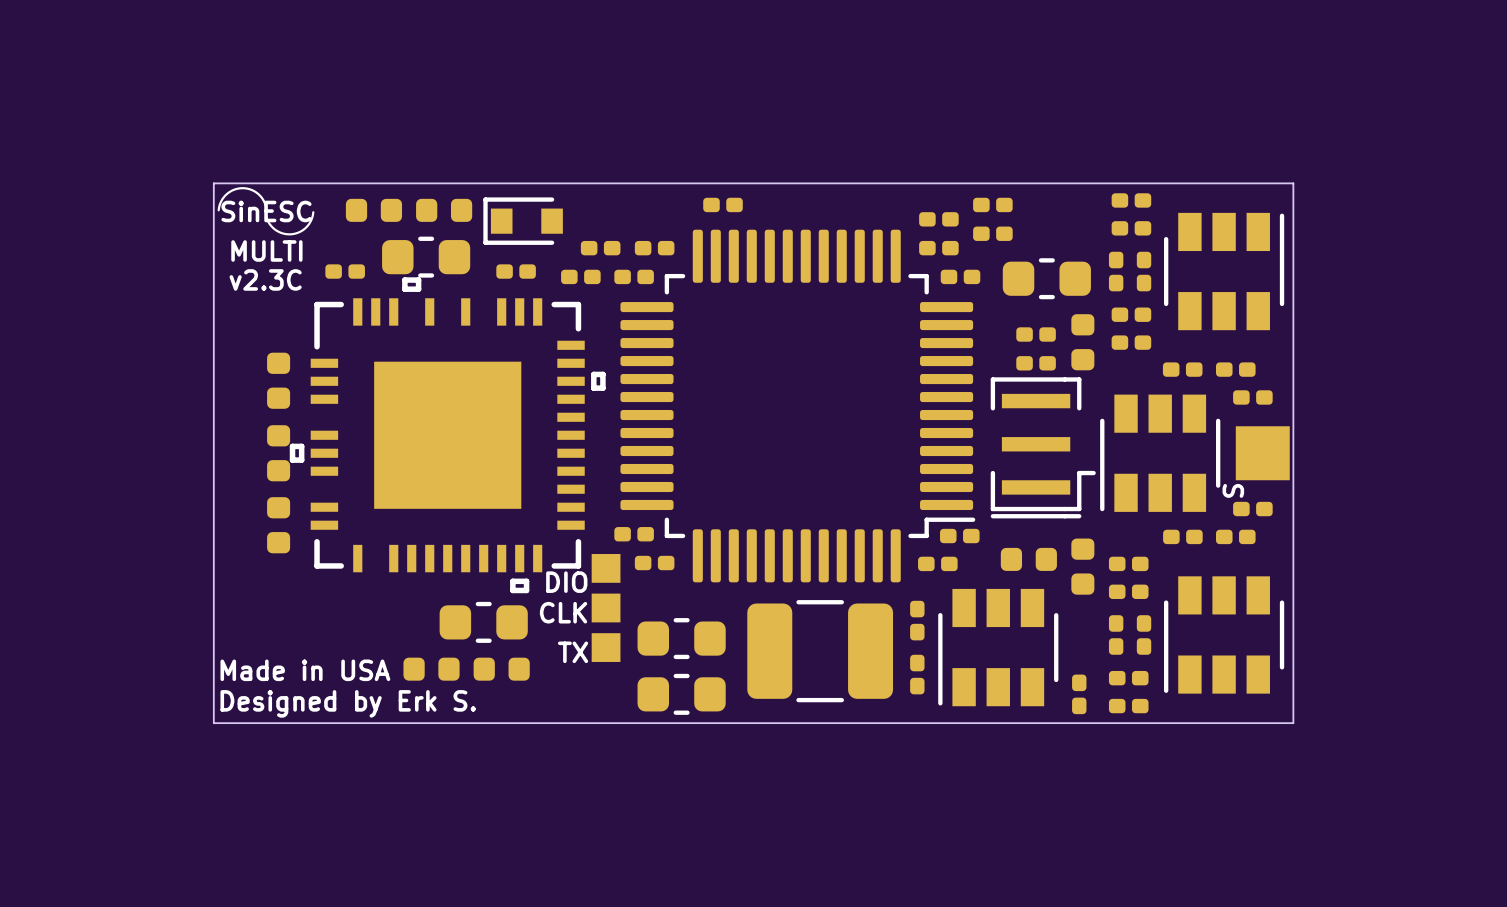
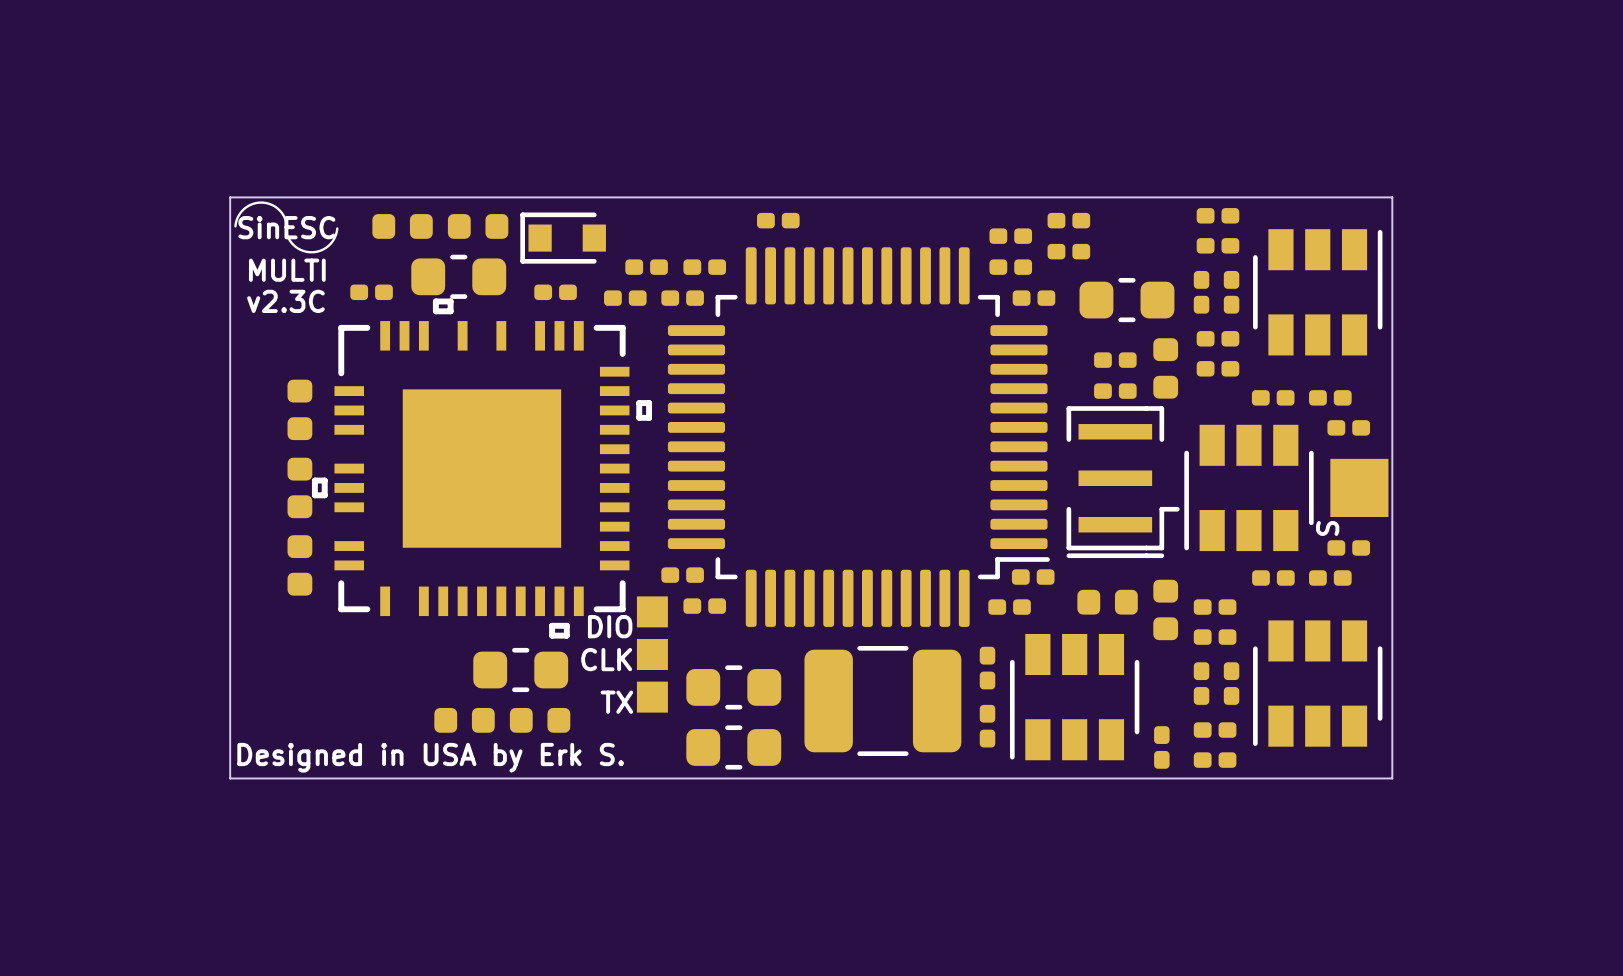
text: Made in USA (305, 670) -> none
text: Designed by Erk S. (348, 703) -> Designed in USA by Erk S. (430, 757)

